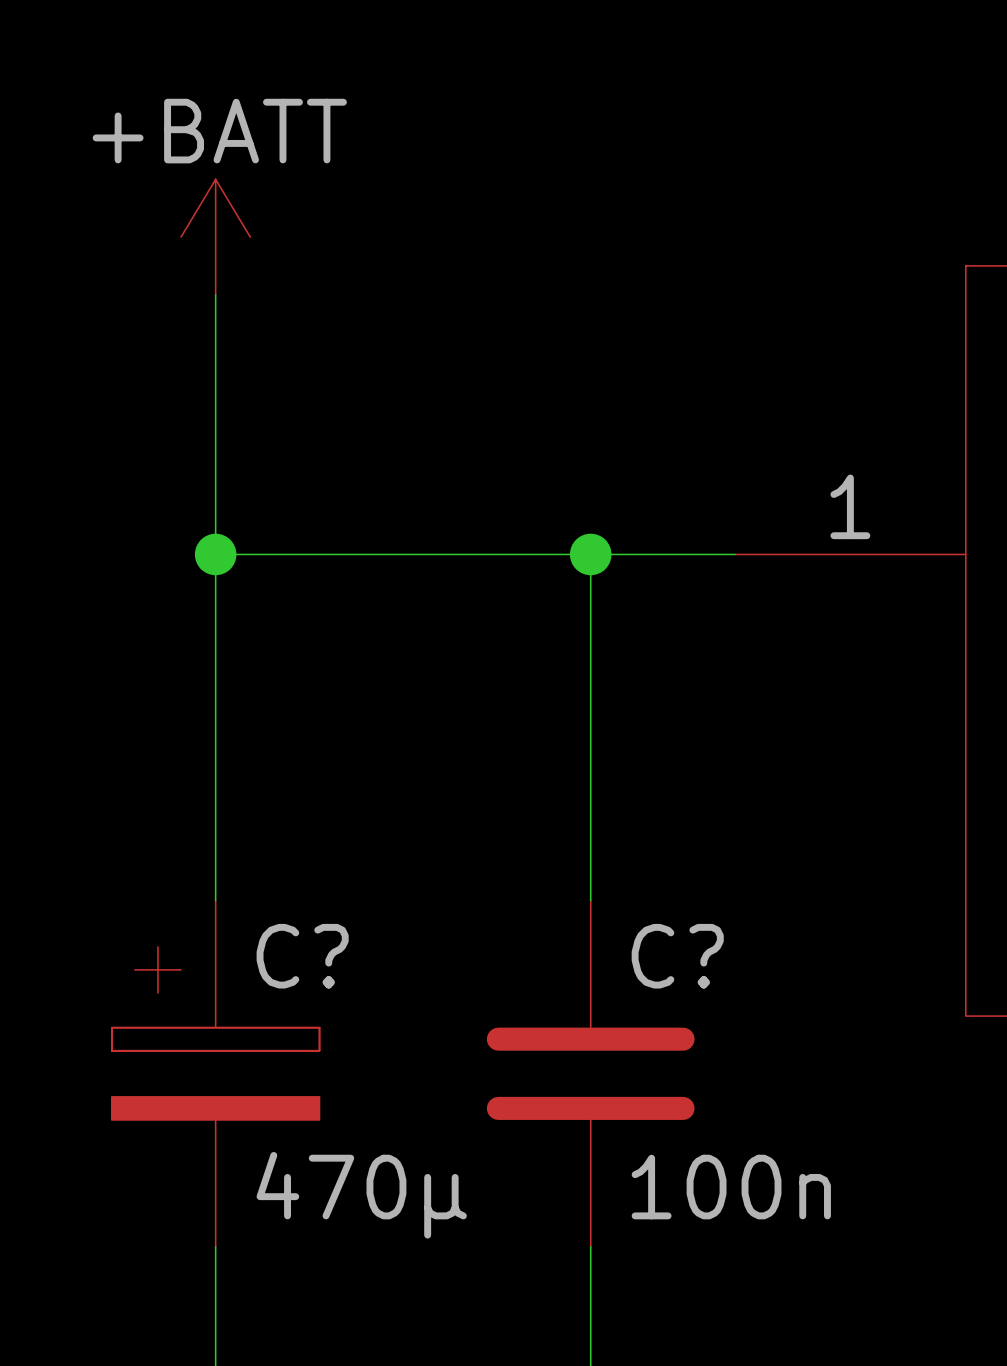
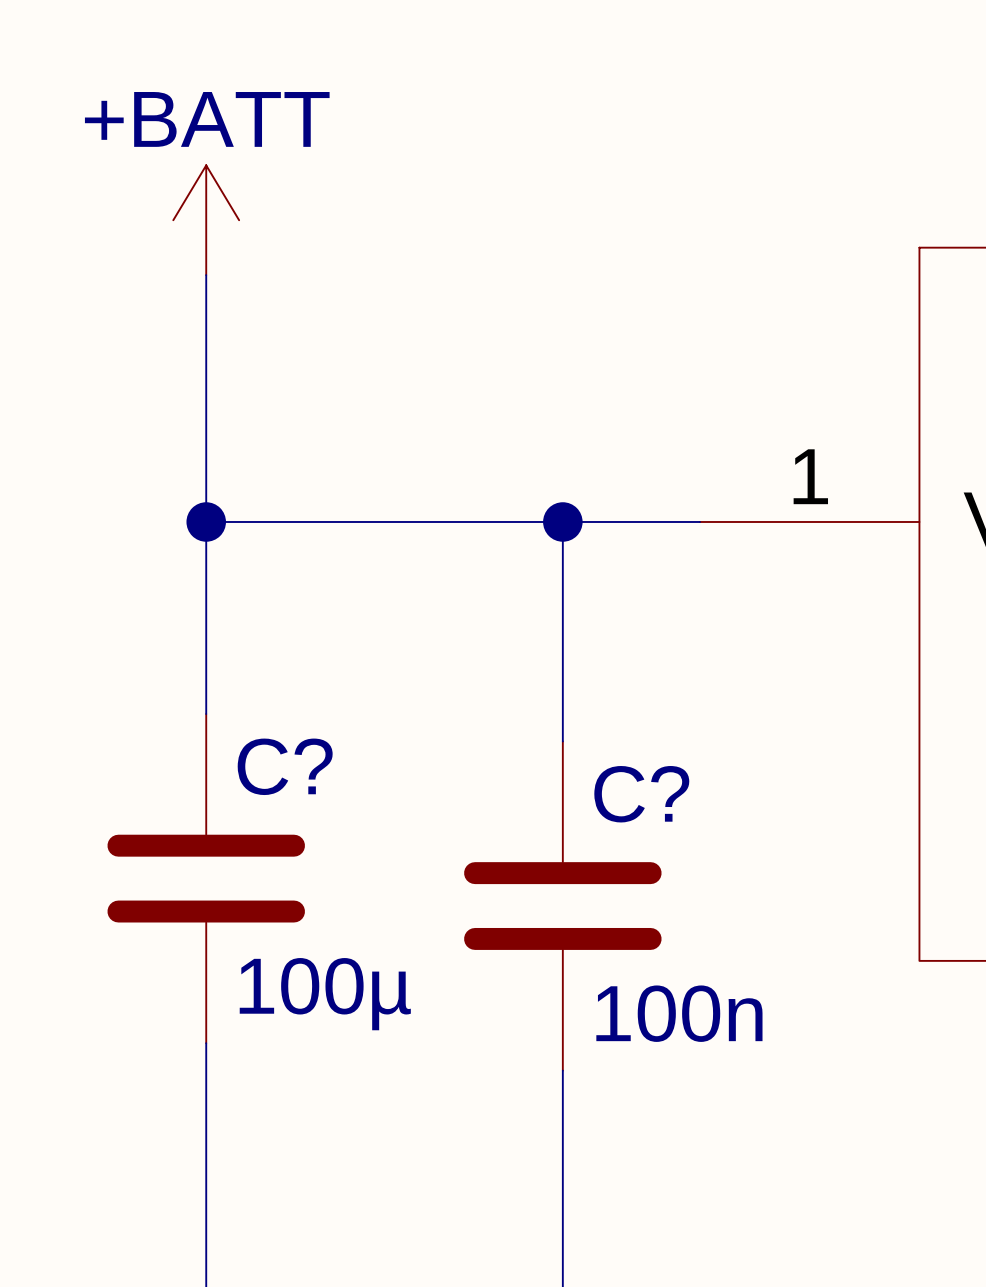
C?: none -> 100µ (206, 878)
C?: 470µ (215, 1073) -> none
C? position: (590, 1073) -> (562, 906)

